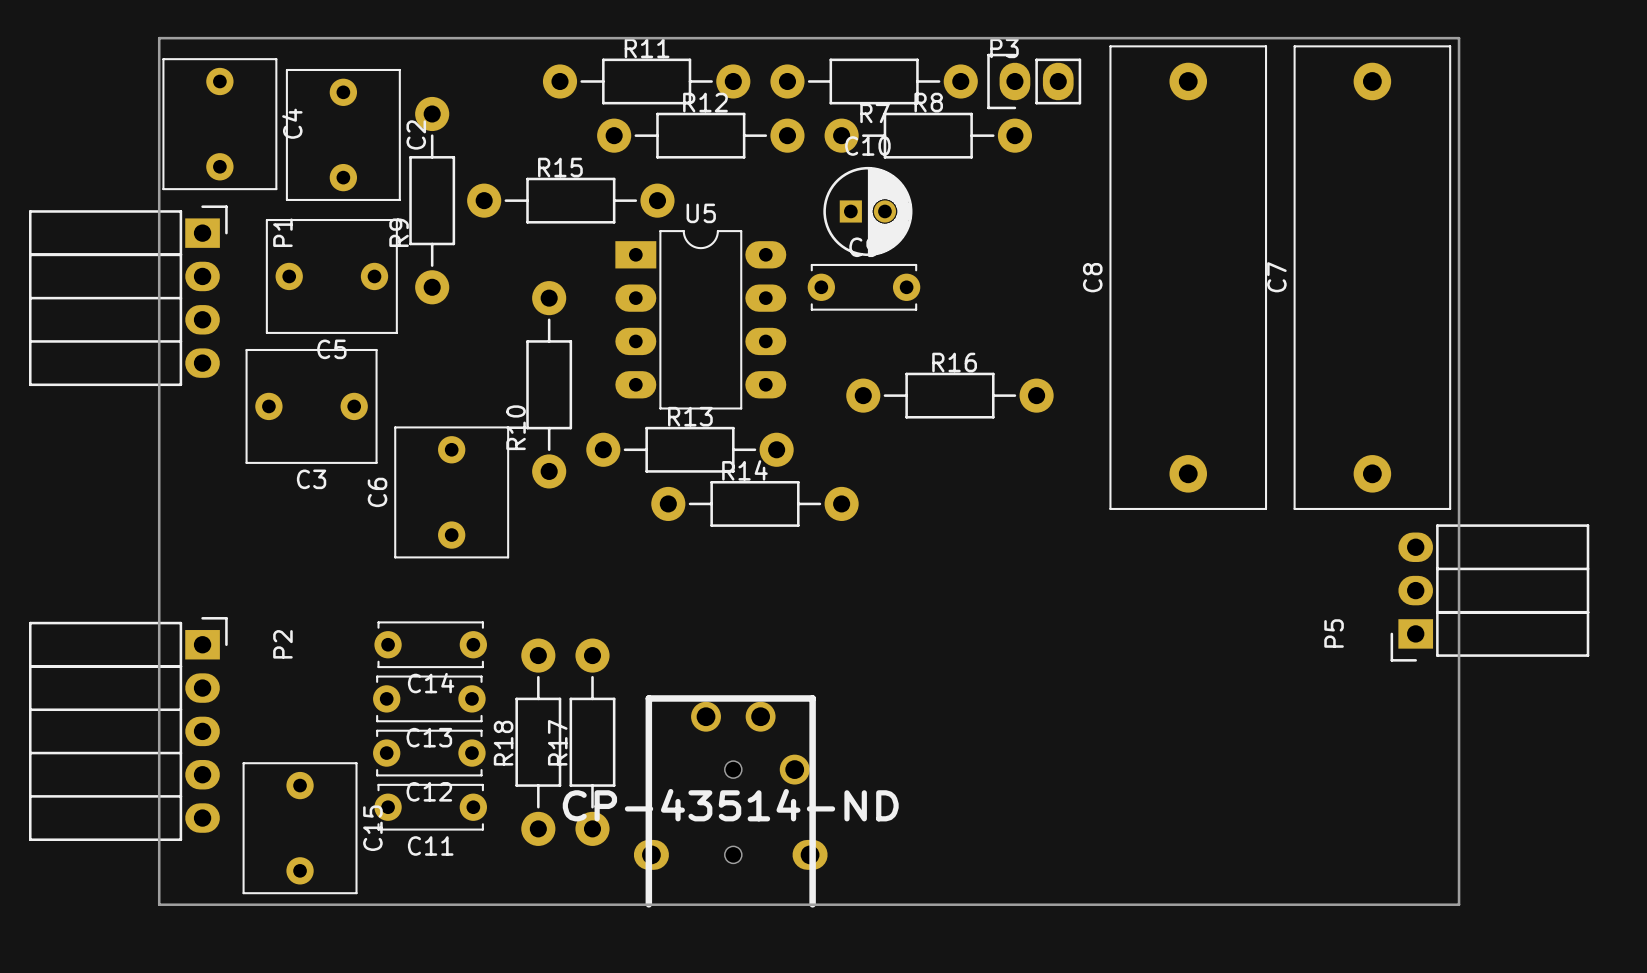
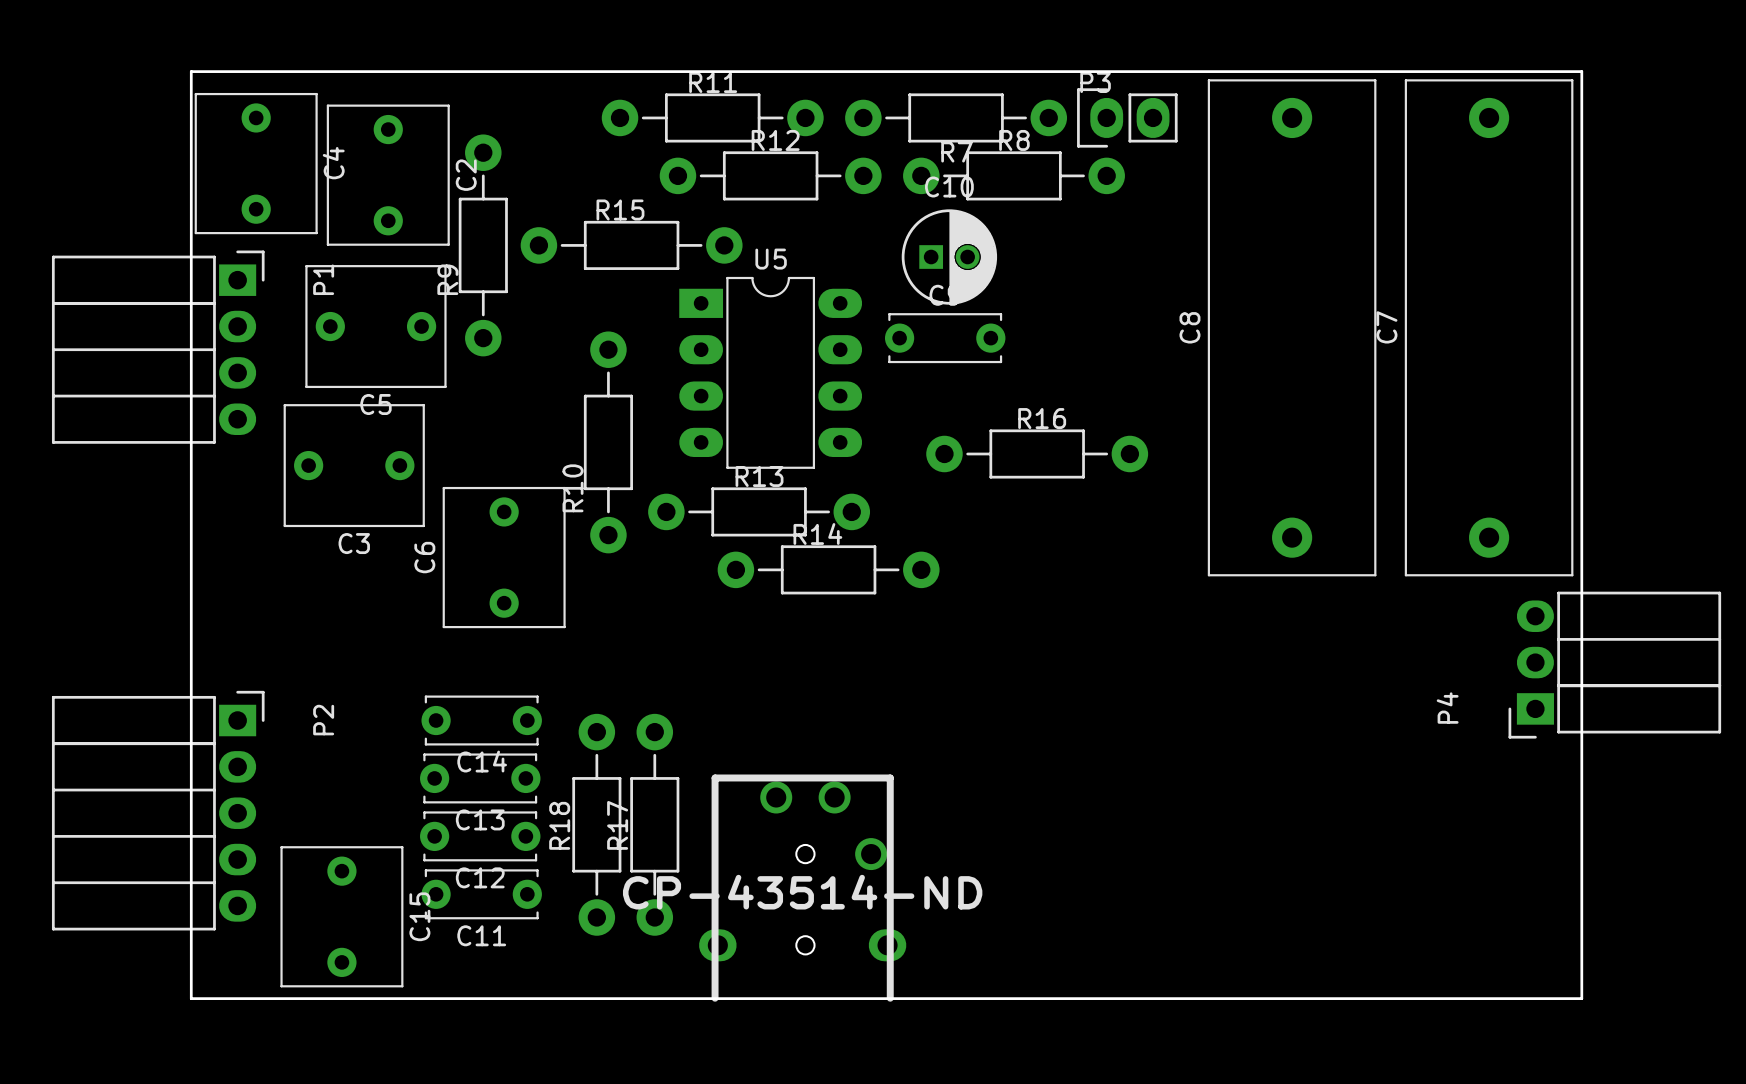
P5: (1489, 592) -> none
P4: none -> (1614, 665)

